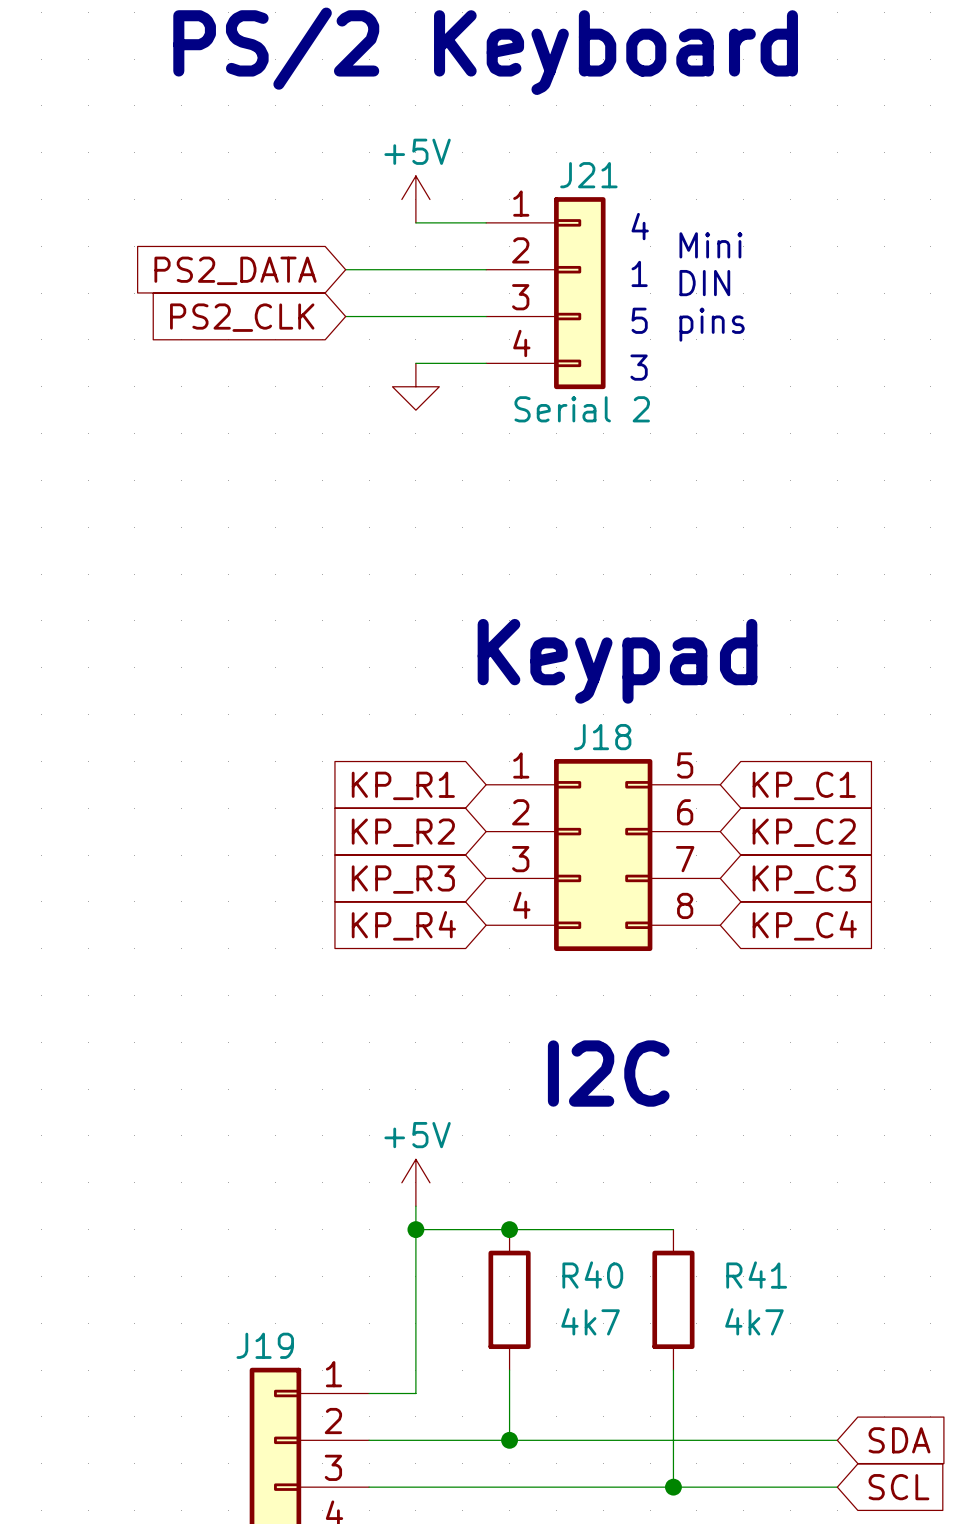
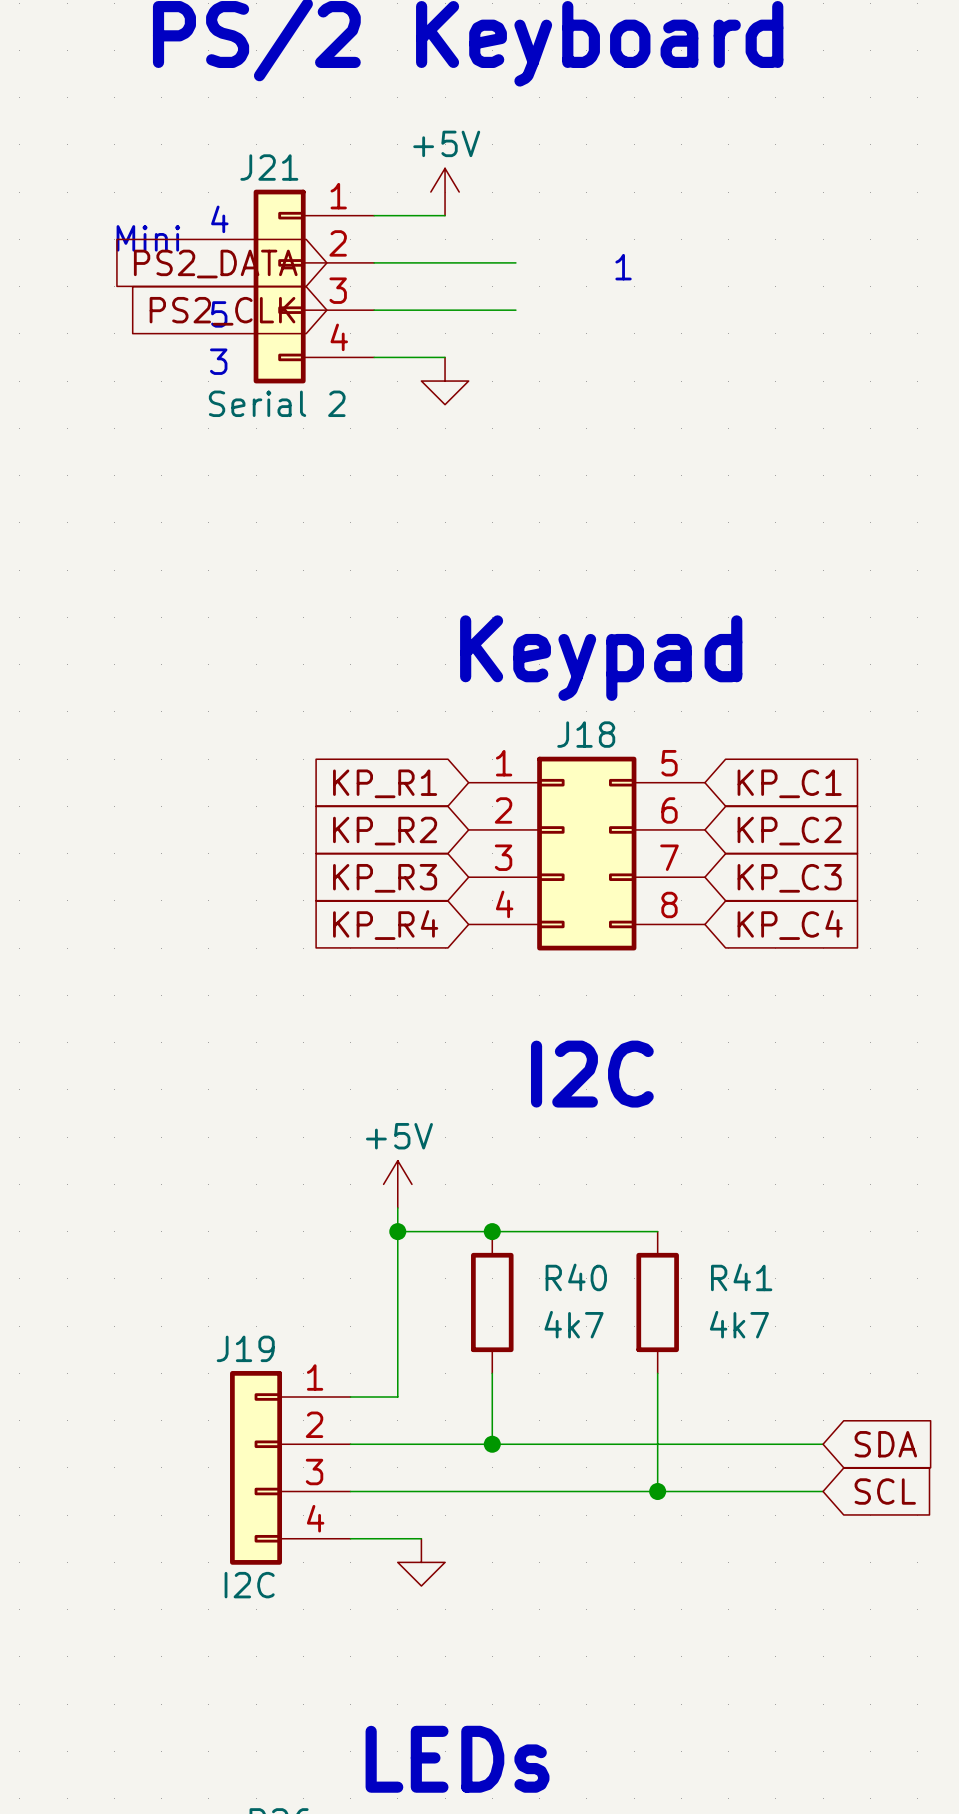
power symbol position: +5V (415, 199) -> +5V (445, 192)
wire: (462, 222) (486, 222) -> (374, 215) (397, 215)
text position: 4 (640, 226) -> 4 (219, 219)
text: none -> Mini (148, 238)
text: Mini (710, 245) -> none
text: DIN (704, 283) -> none
J21 position: (545, 293) -> (313, 286)
J21 flip: as is (579, 293) -> left-right (279, 286)
text position: 5 (639, 320) -> 5 (219, 314)
text: pins (712, 324) -> none
wire: (462, 363) (486, 363) -> (374, 357) (397, 357)
text position: 3 (639, 367) -> 3 (218, 361)
power symbol position: (415, 386) -> (445, 381)

